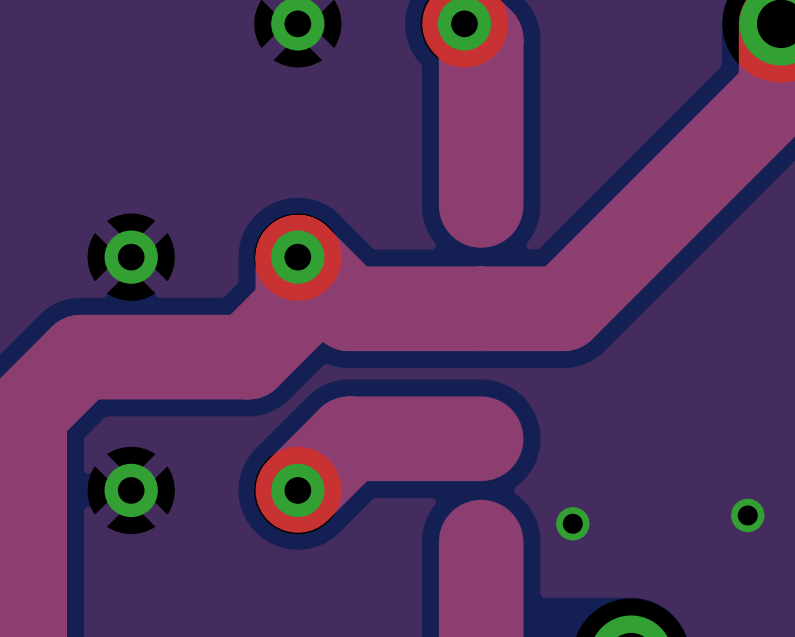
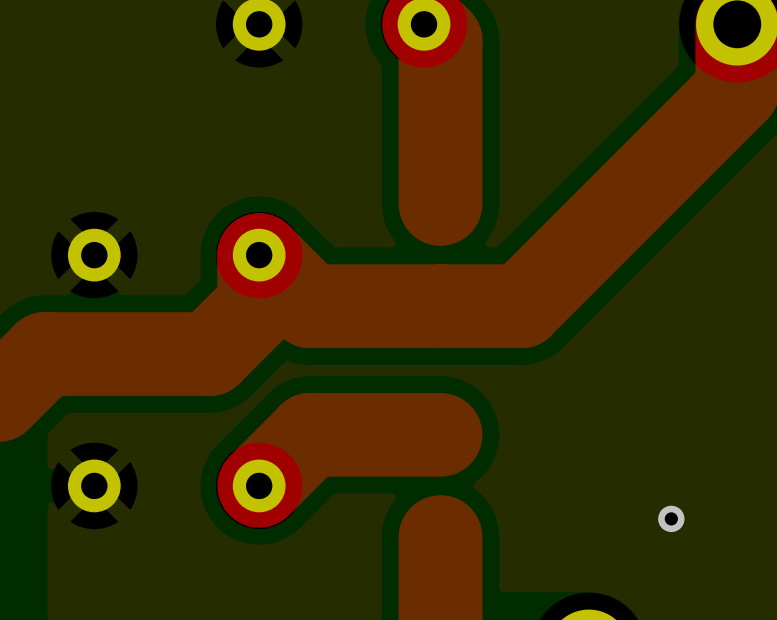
via: (747, 515) -> none
via: (572, 523) -> none
via: none -> (671, 518)

